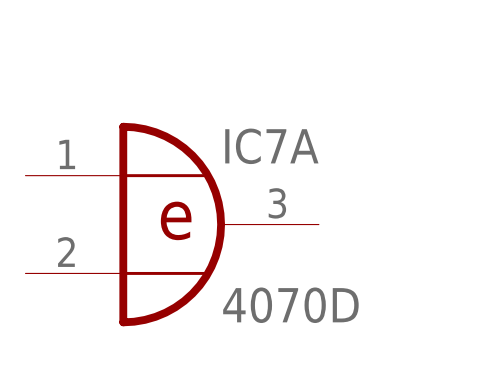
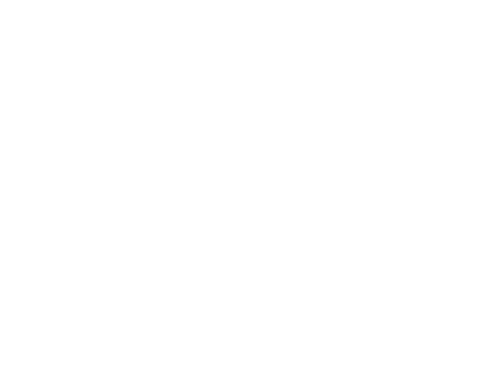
IC7A: 4070D (172, 224) -> none

